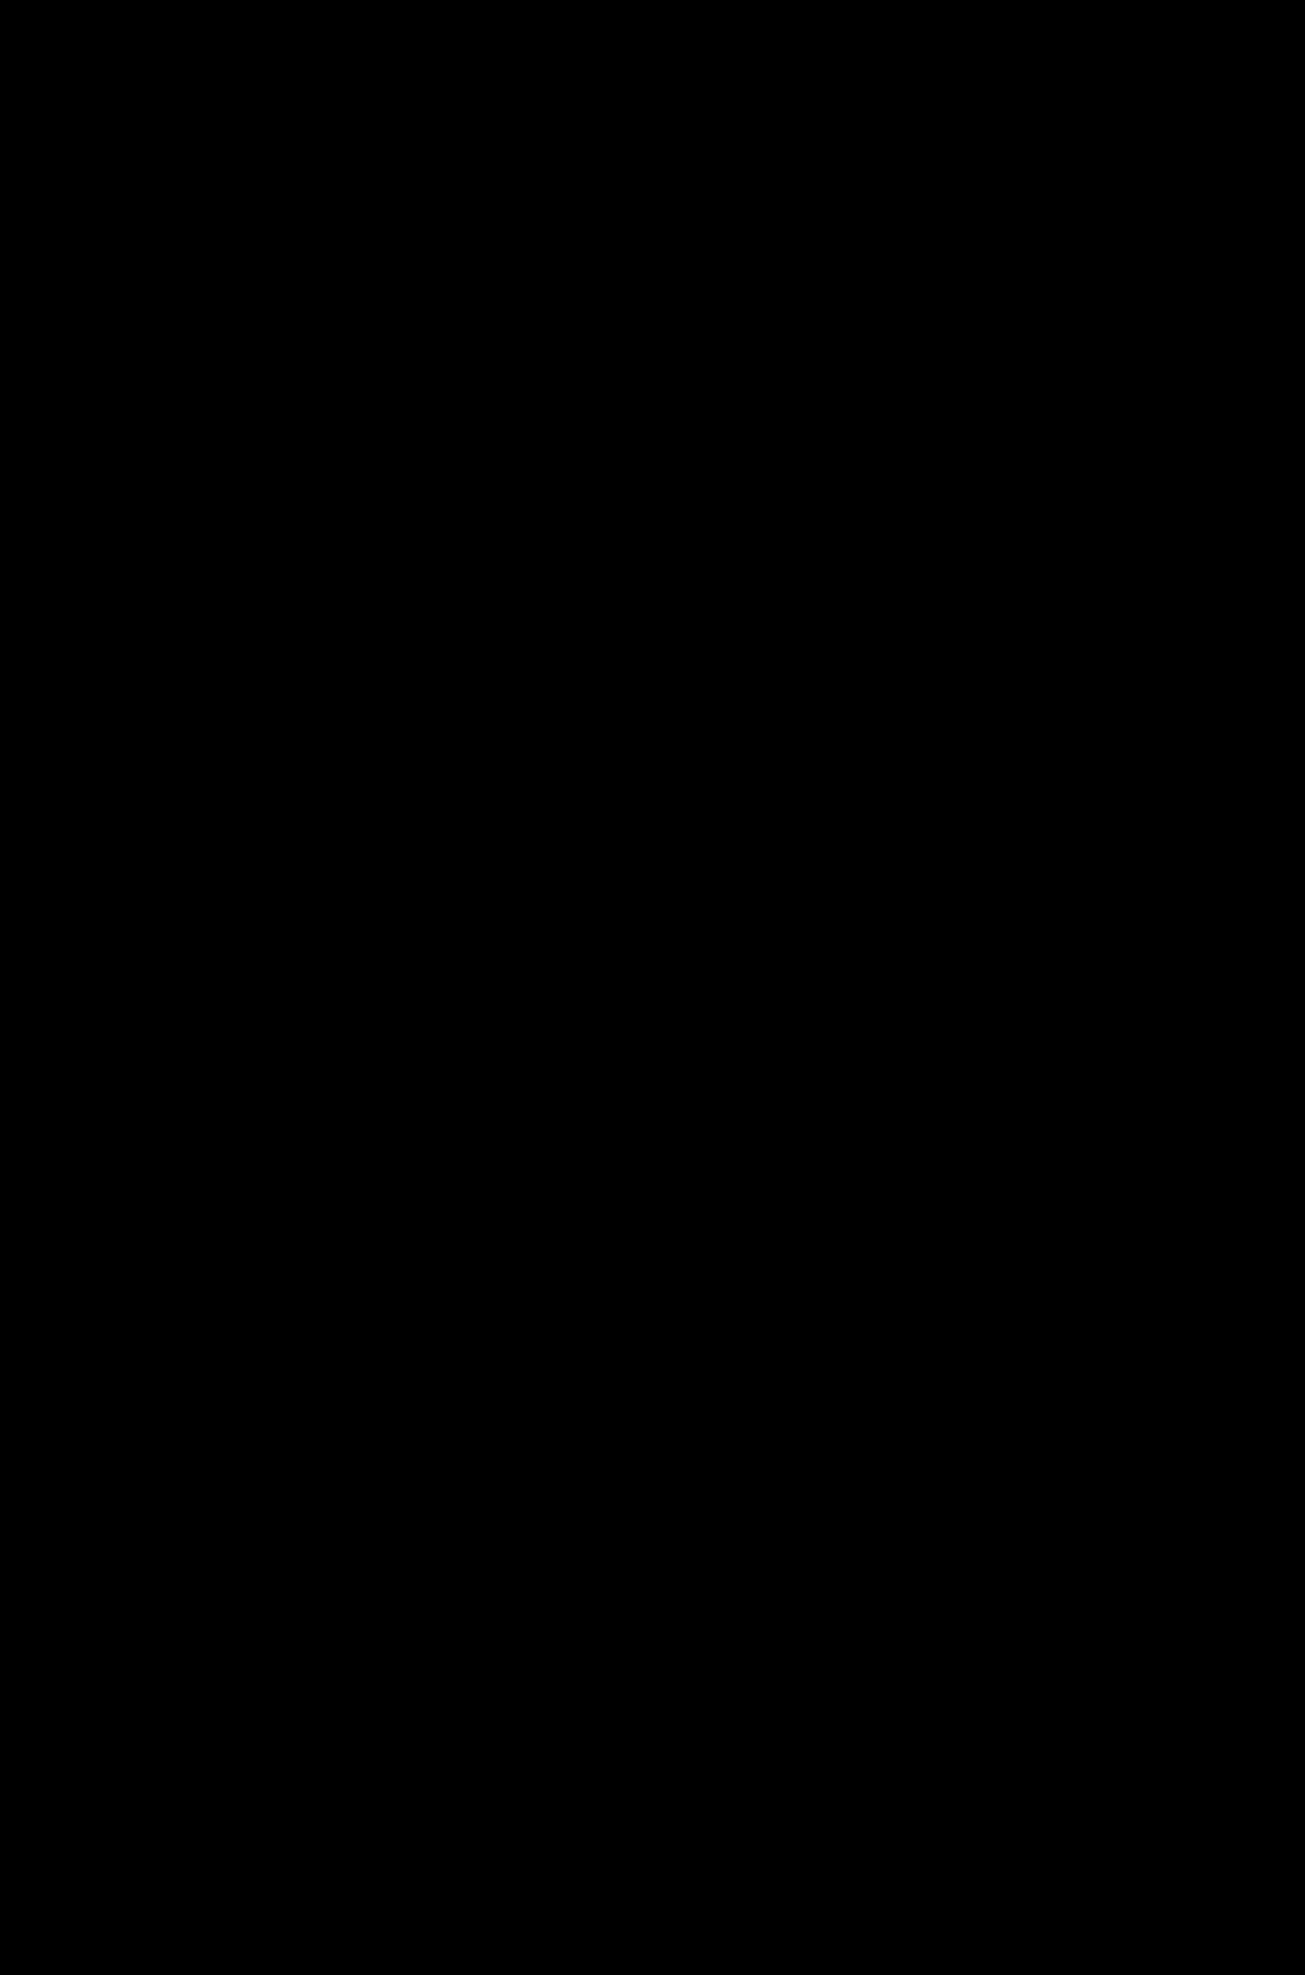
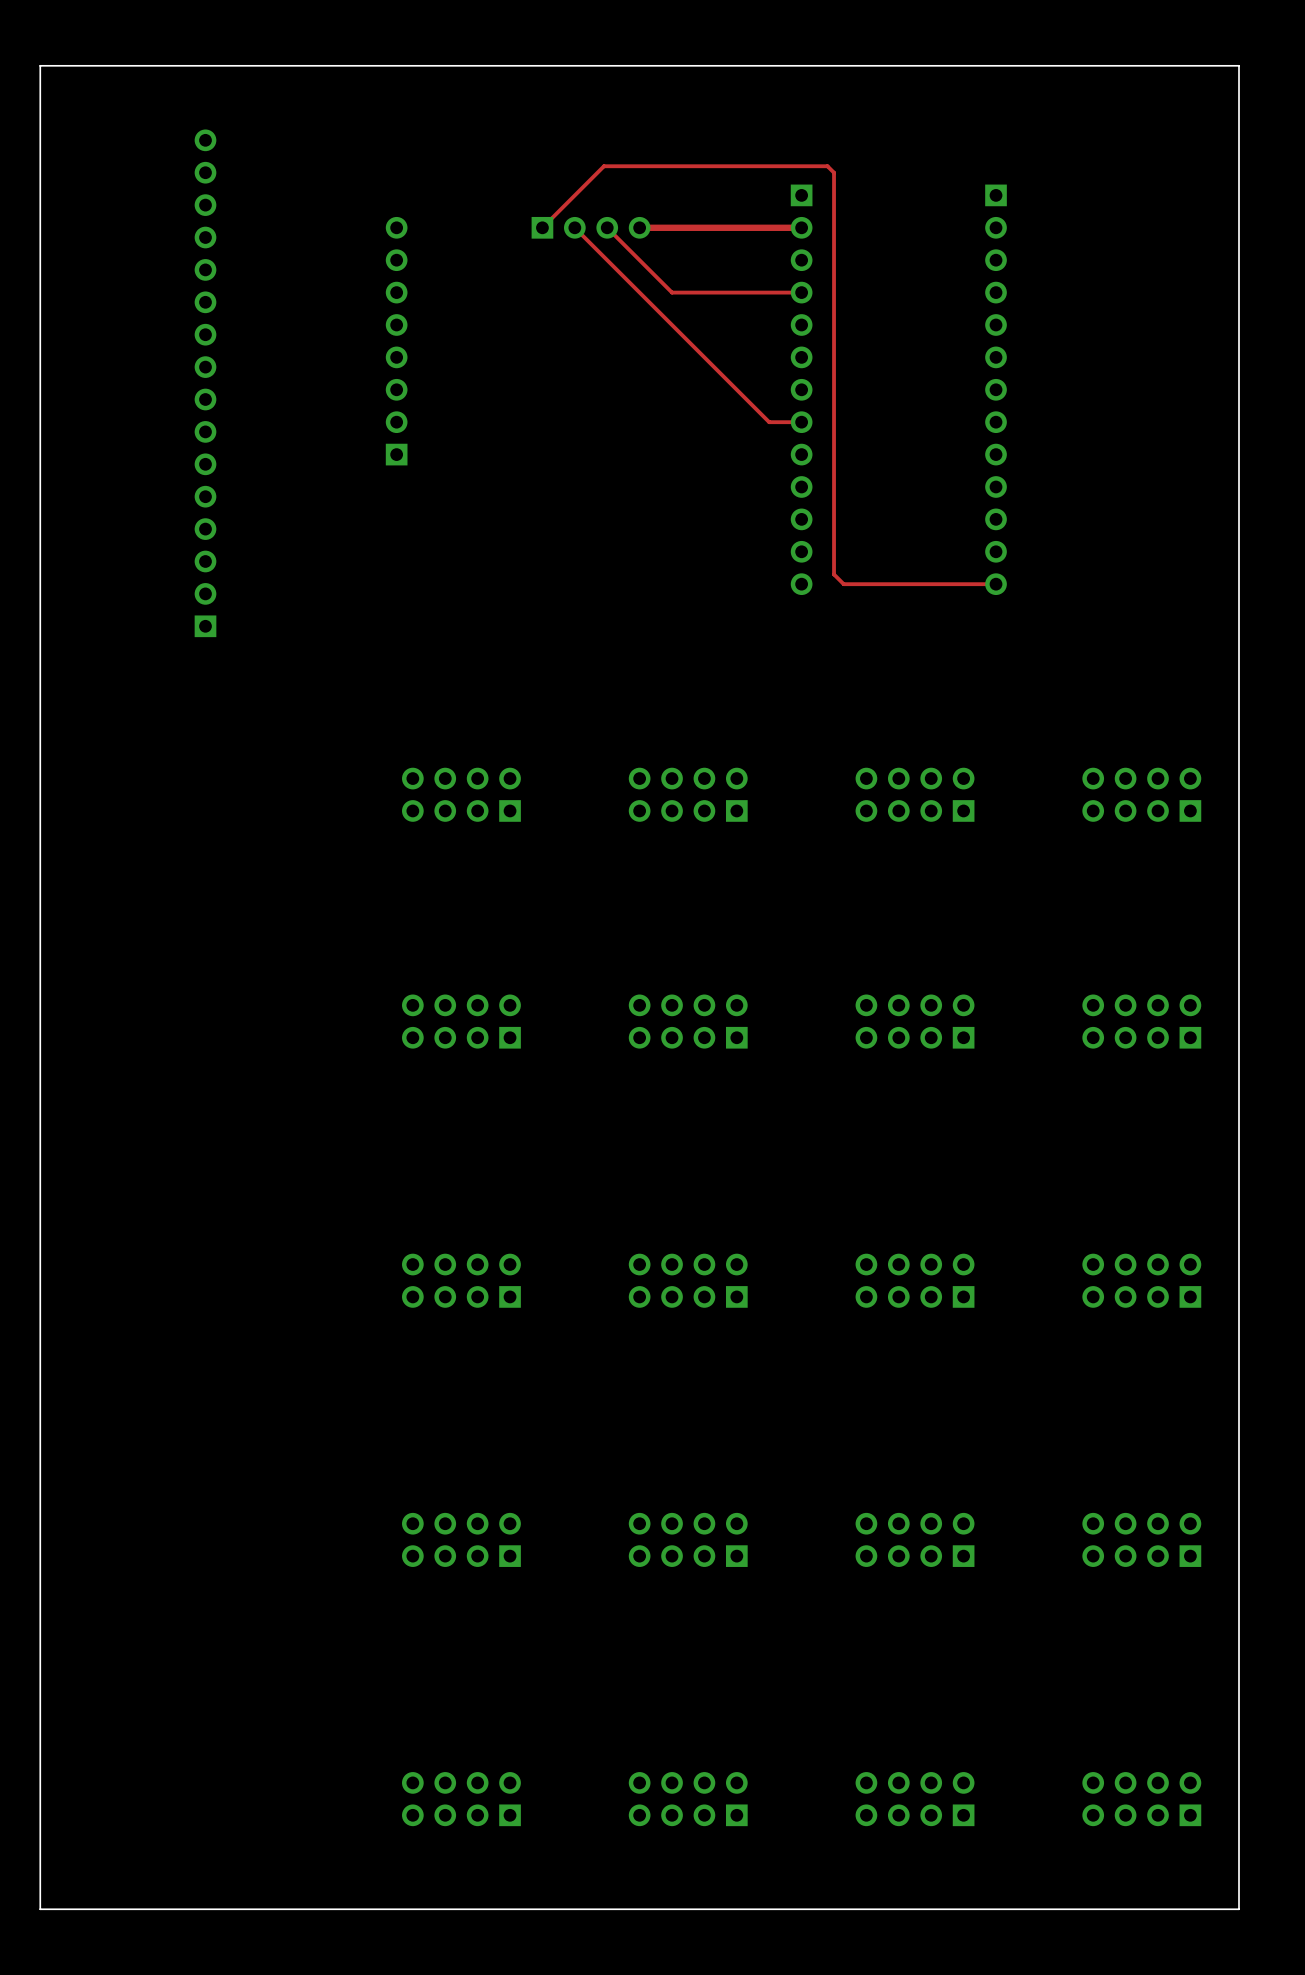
board edge: none -> (1239, 65) (40, 65) (40, 1909) (1239, 1909) (1239, 65)
top track: none -> (542, 227) (603, 166) (827, 166) (834, 172) (834, 574) (843, 584) (996, 584)
top track: none -> (574, 227) (769, 422) (801, 422)
part: none -> (591, 227)
top track: none -> (607, 227) (672, 292) (801, 292)
top track: none -> (801, 227) (639, 227)
part: none -> (396, 341)
part: none -> (205, 383)
part: none -> (801, 389)
part: none -> (996, 389)
part: none -> (461, 794)
part: none -> (688, 794)
part: none -> (915, 794)
part: none -> (1141, 794)
part: none -> (461, 1021)
part: none -> (688, 1021)
part: none -> (915, 1021)
part: none -> (1141, 1021)
part: none -> (461, 1280)
part: none -> (688, 1280)
part: none -> (915, 1280)
part: none -> (1141, 1280)
part: none -> (461, 1539)
part: none -> (688, 1539)
part: none -> (915, 1539)
part: none -> (1141, 1539)
part: none -> (461, 1799)
part: none -> (688, 1799)
part: none -> (915, 1799)
part: none -> (1141, 1799)

